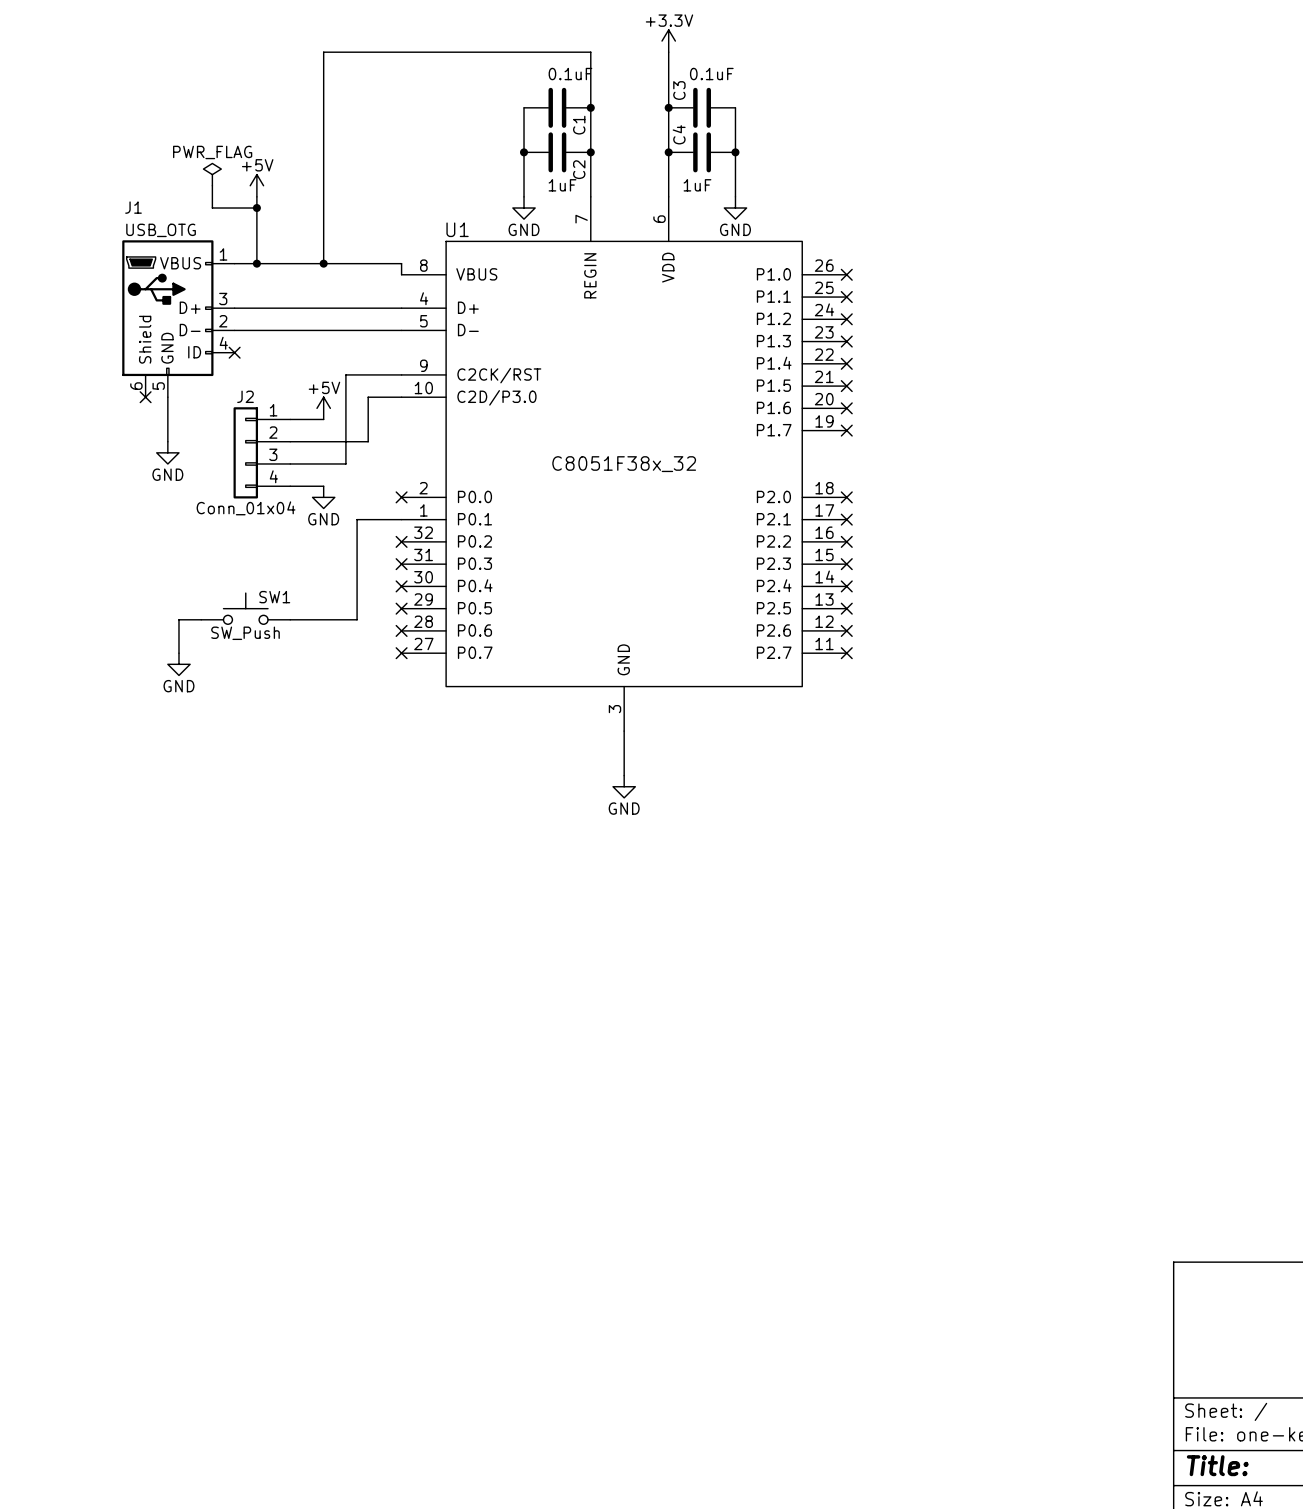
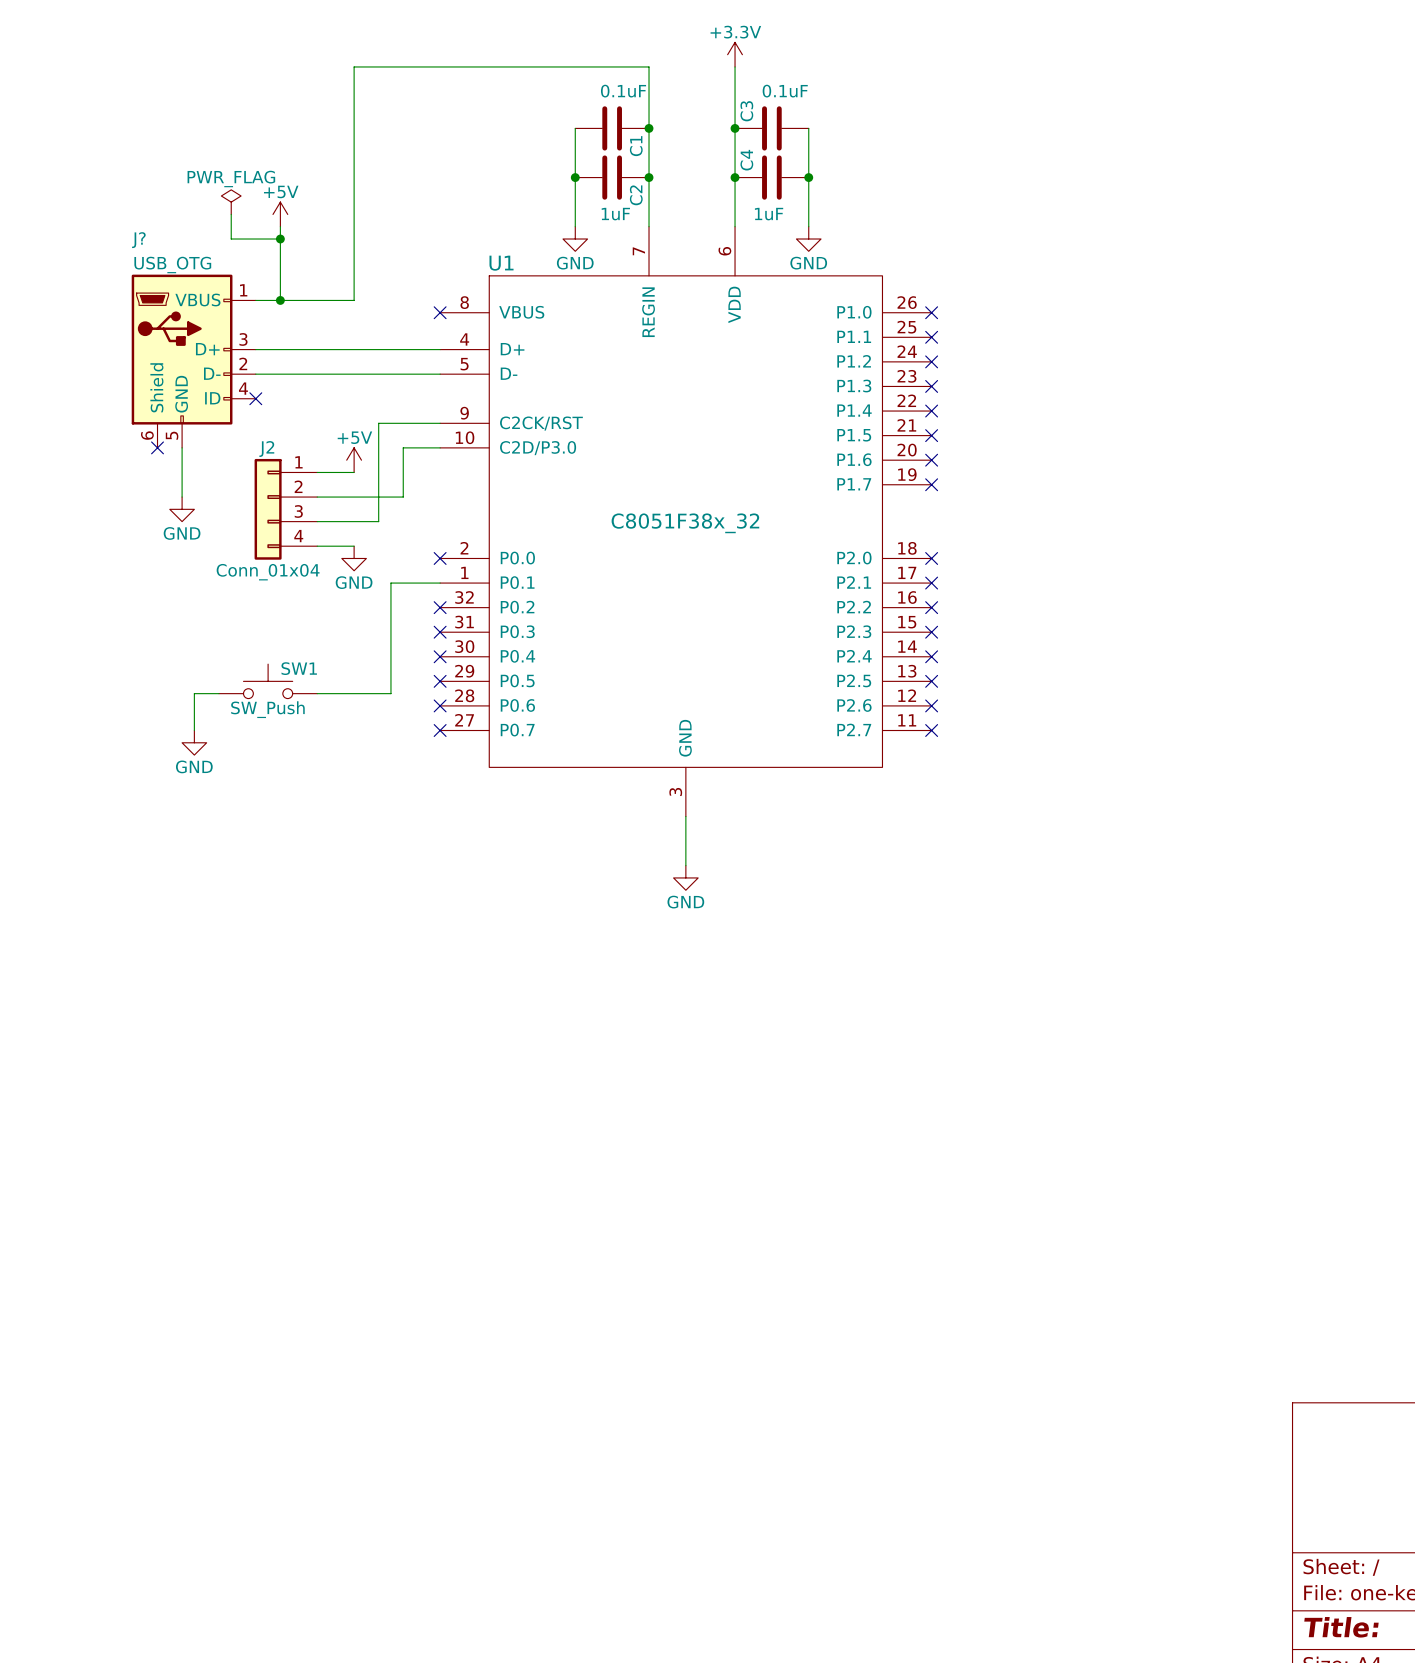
J1 name: J1 (133, 207) -> J? (138, 240)
wire: (323, 263) (401, 263) (401, 274) -> none
junction: (323, 263) -> none
no-connect mark: none -> (440, 312)

